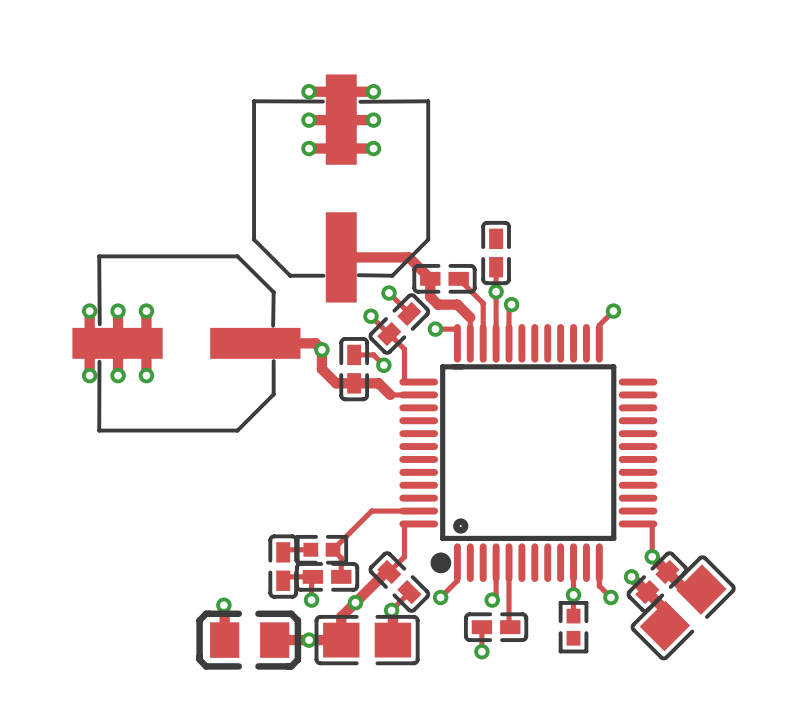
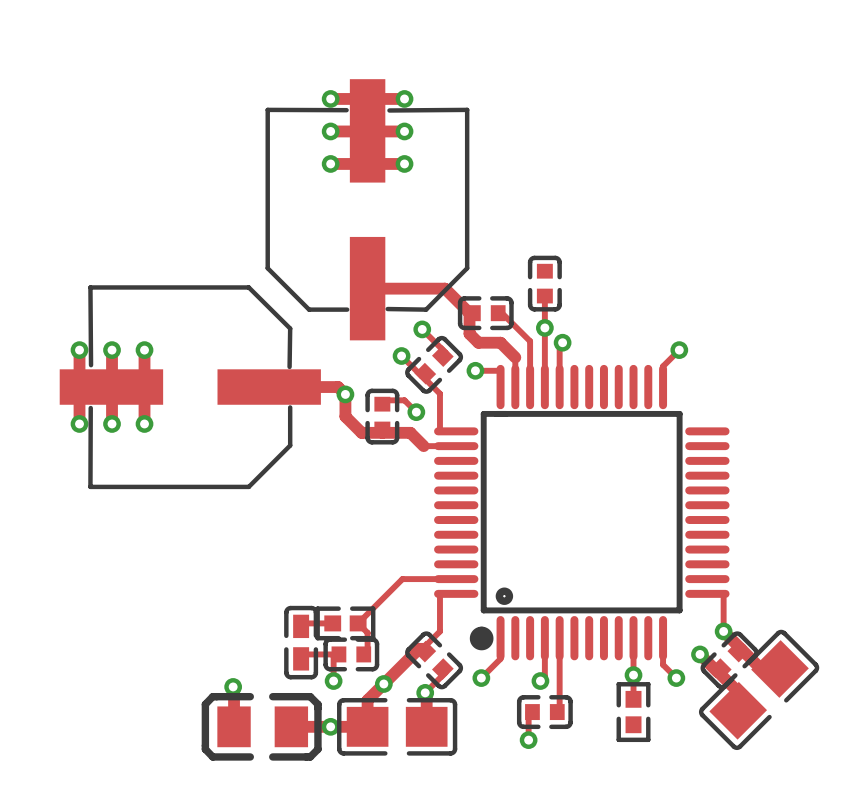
part footprint: [481, 220, 511, 286] -> [527, 255, 562, 312]
part footprint: [412, 263, 477, 294] -> [457, 296, 514, 331]
part footprint: [368, 293, 431, 355] -> [405, 335, 464, 394]
part footprint: [339, 337, 370, 402] -> [365, 388, 400, 445]
part footprint: [368, 551, 431, 613] -> [405, 631, 464, 690]
part footprint: [626, 551, 689, 613] -> [700, 631, 759, 690]
part footprint: [294, 562, 360, 592] -> [323, 637, 380, 672]
part footprint: [463, 612, 529, 643] -> [516, 695, 573, 730]

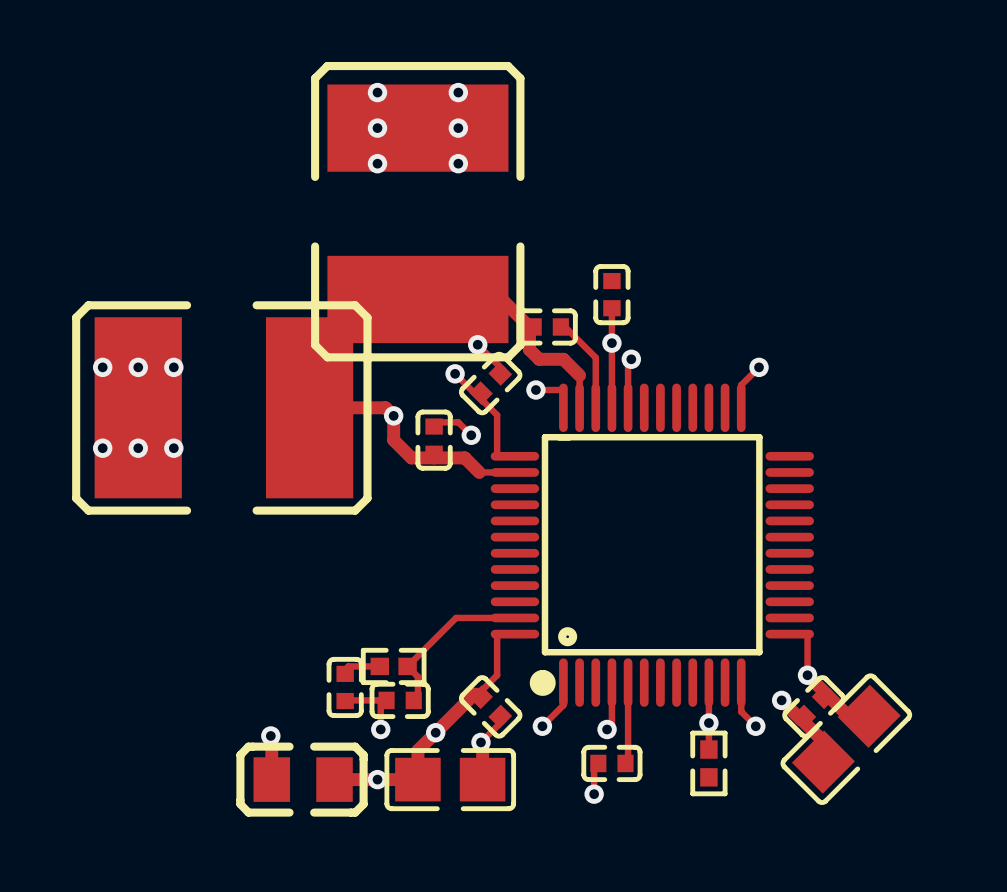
part footprint: [265, 79, 470, 341] -> [311, 62, 525, 362]
part footprint: [59, 285, 321, 490] -> [72, 301, 372, 515]
part footprint: [284, 605, 319, 680] -> [326, 656, 364, 719]

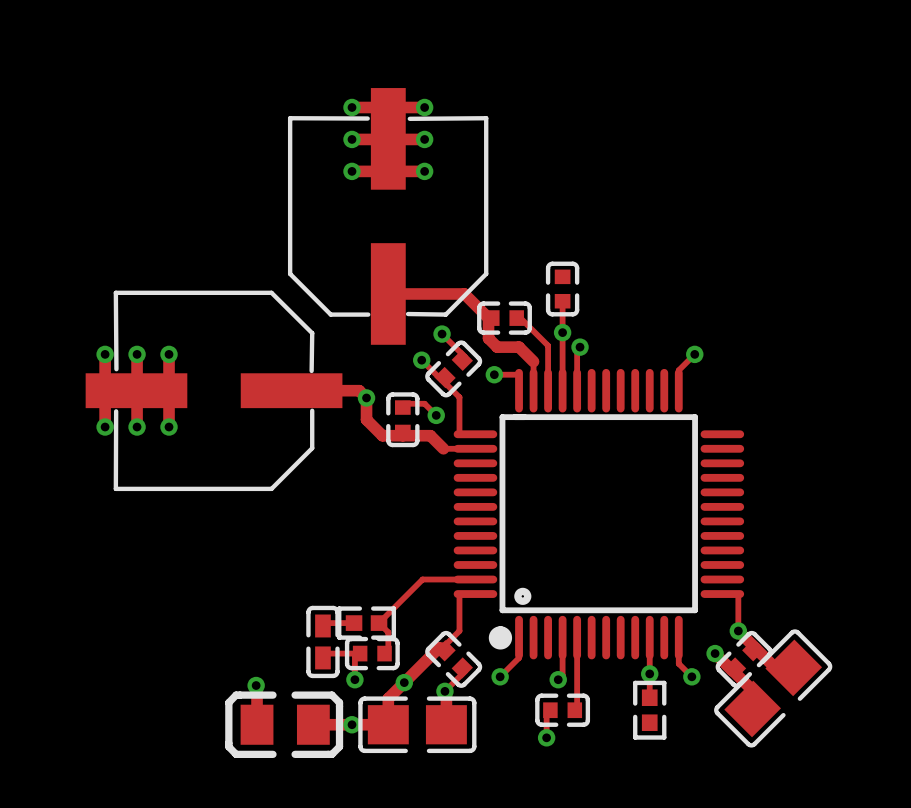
part footprint: [311, 62, 525, 362] -> [287, 88, 489, 345]
part footprint: [72, 301, 372, 515] -> [85, 290, 343, 492]
part footprint: [326, 656, 364, 719] -> [306, 605, 340, 679]

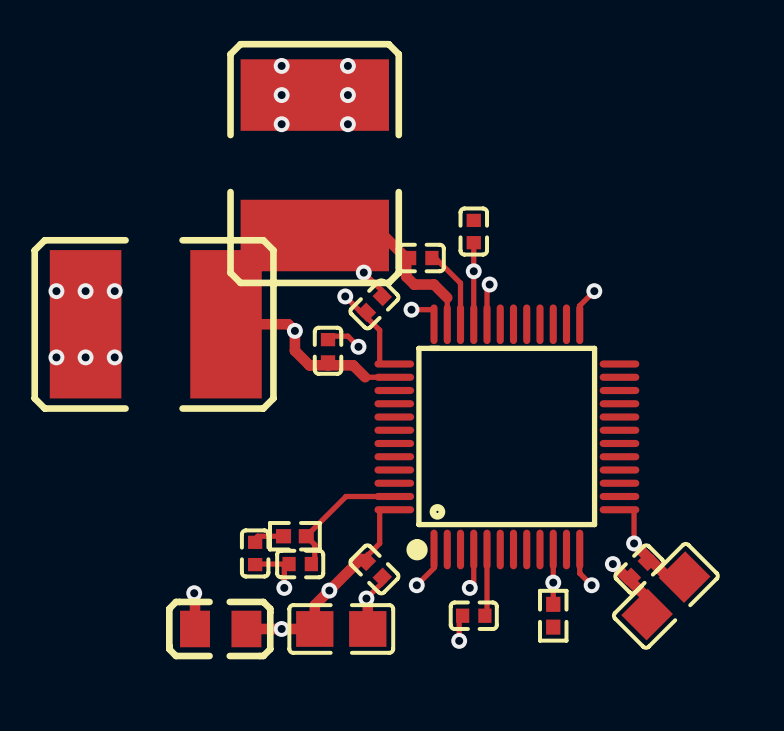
part footprint: [287, 88, 489, 345] -> [227, 40, 403, 287]
part footprint: [85, 290, 343, 492] -> [31, 236, 277, 412]
part footprint: [306, 605, 340, 679] -> [239, 528, 271, 579]

